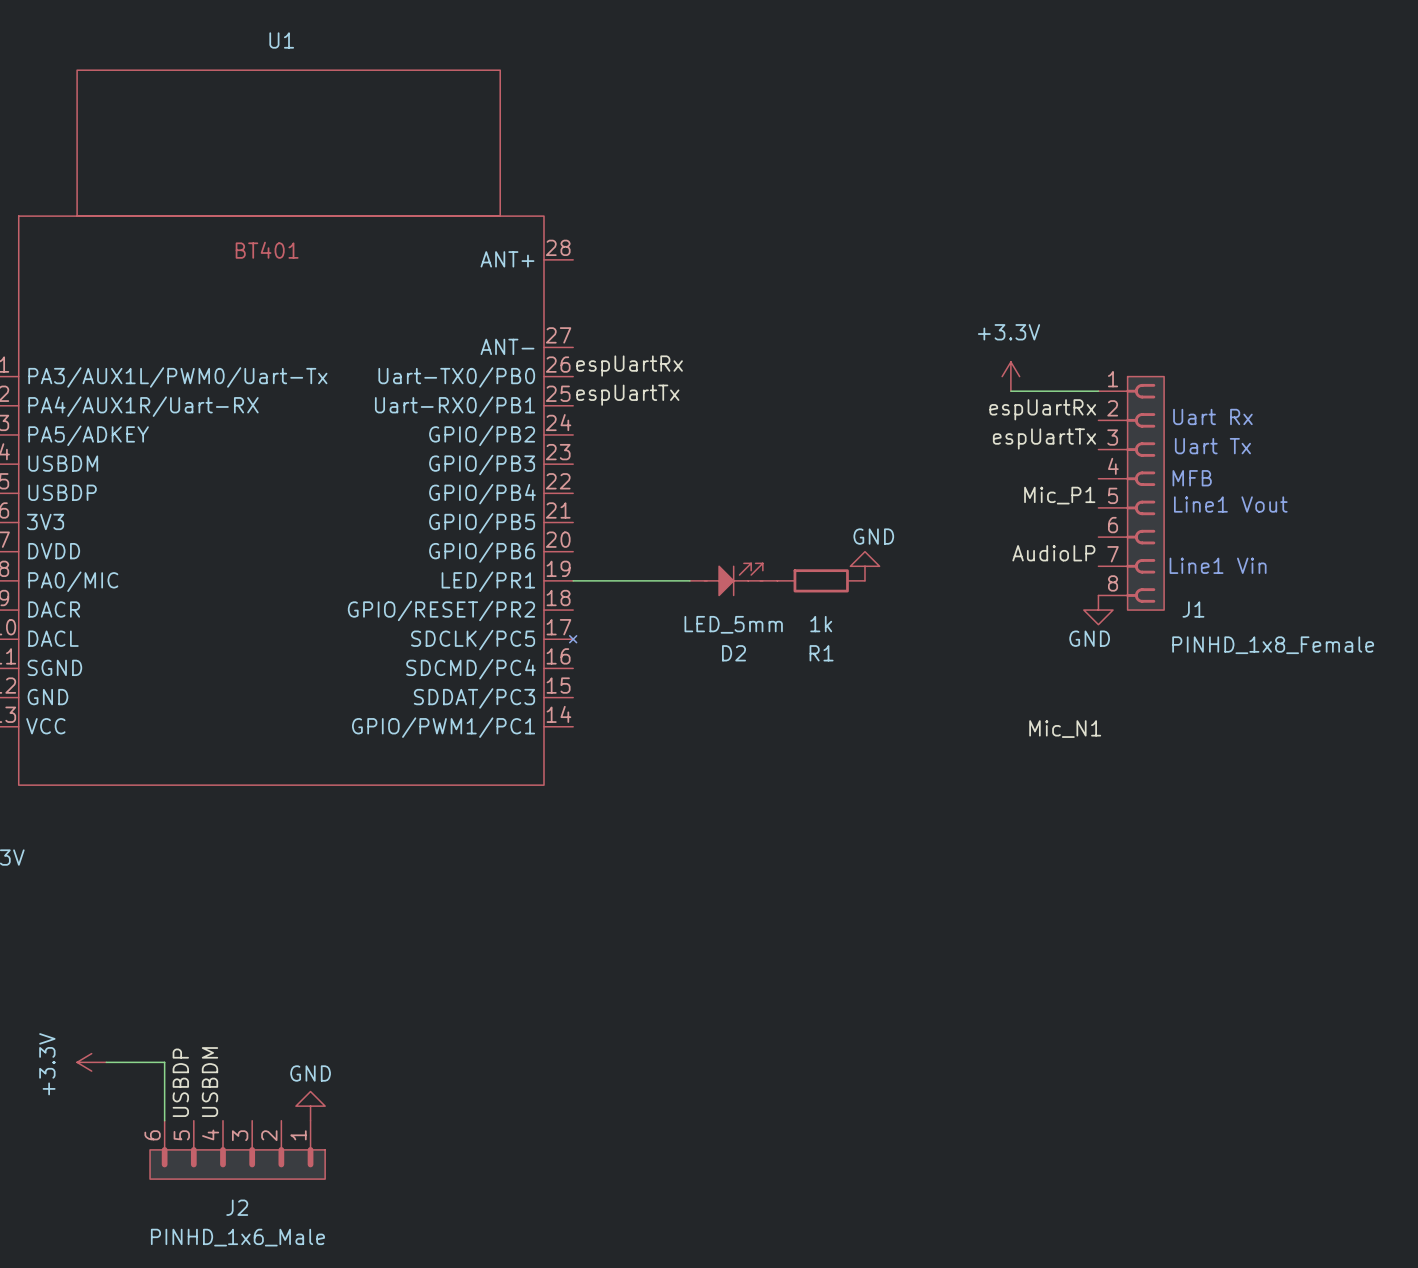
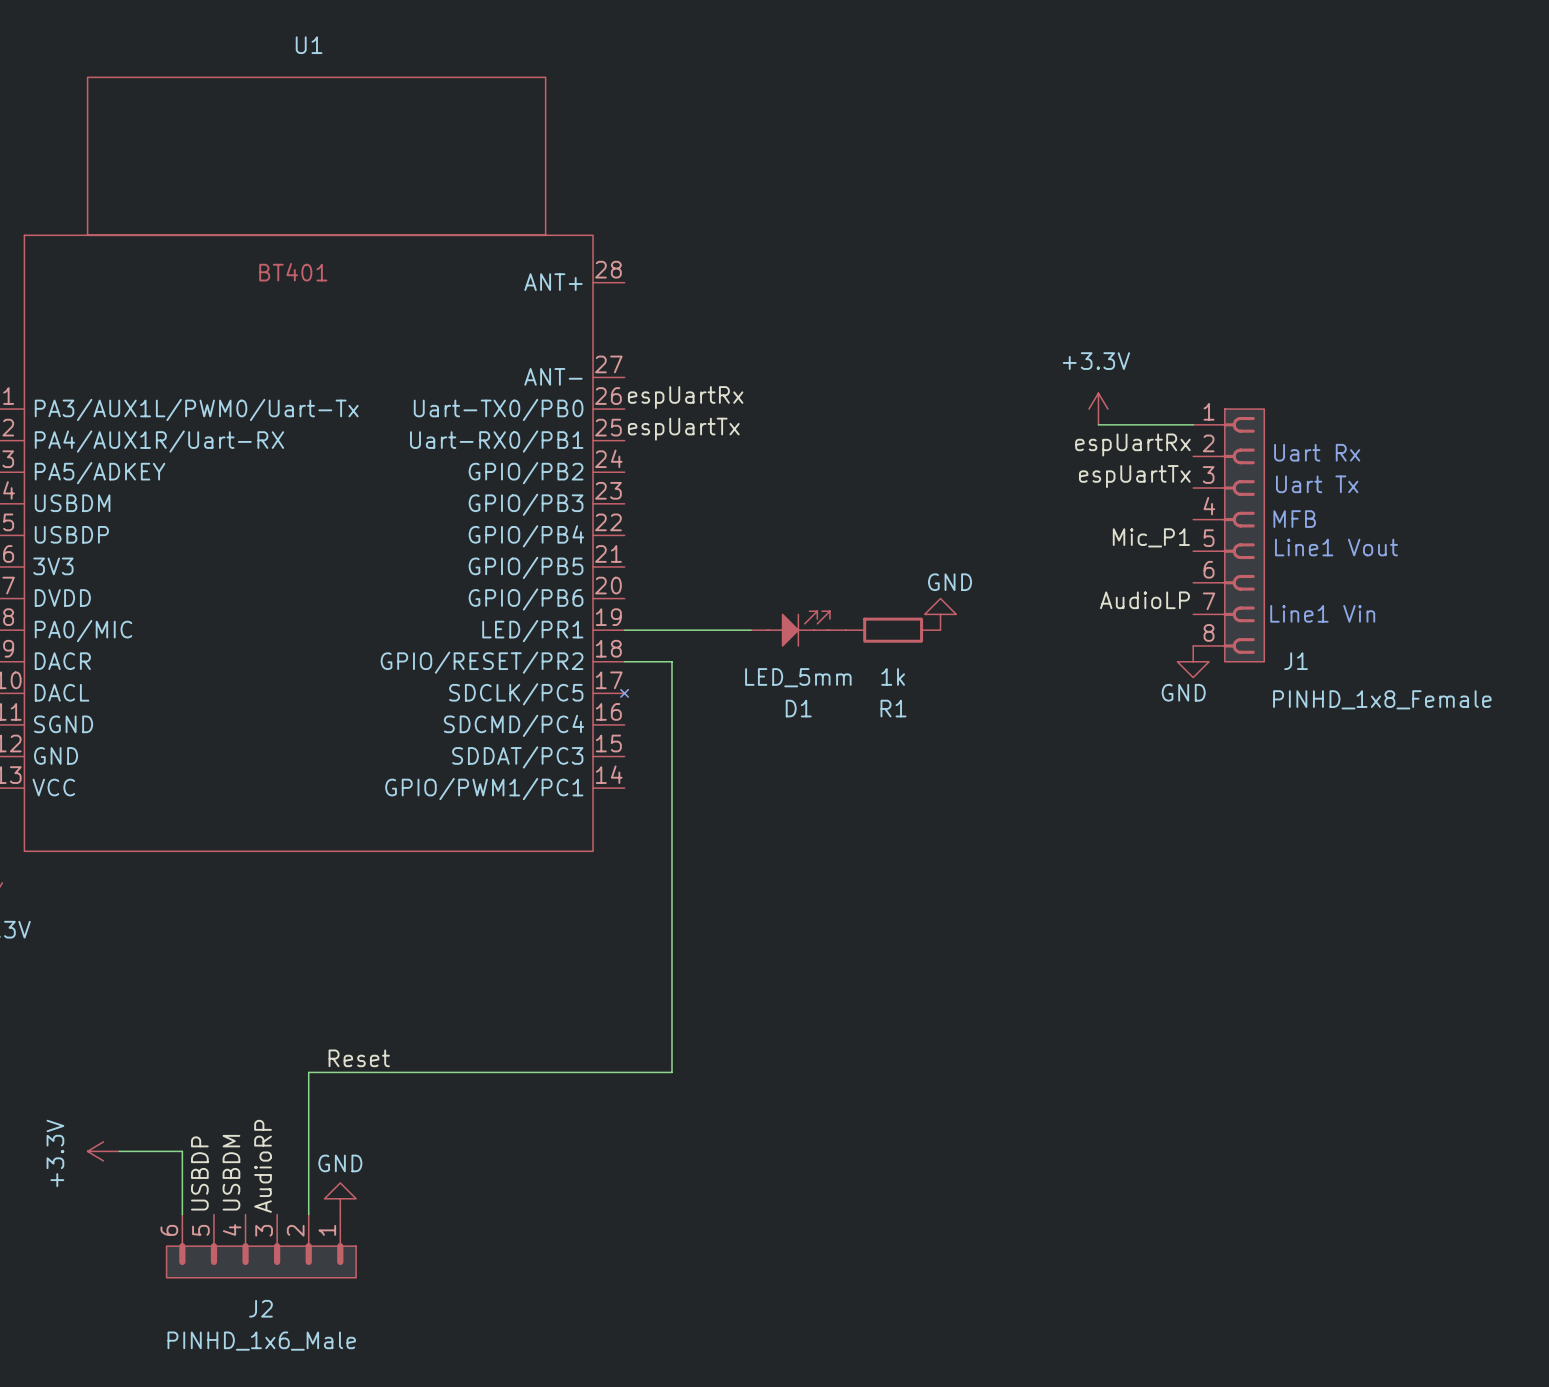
wire: none -> (624, 661) (672, 661) (672, 1072) (308, 1072) (308, 1214)
D2 name: D2 (734, 653) -> D1 (798, 708)
label: Mic_N1 (1065, 729) -> none
label: none -> Reset (359, 1058)
label: none -> AudioRP (263, 1166)

